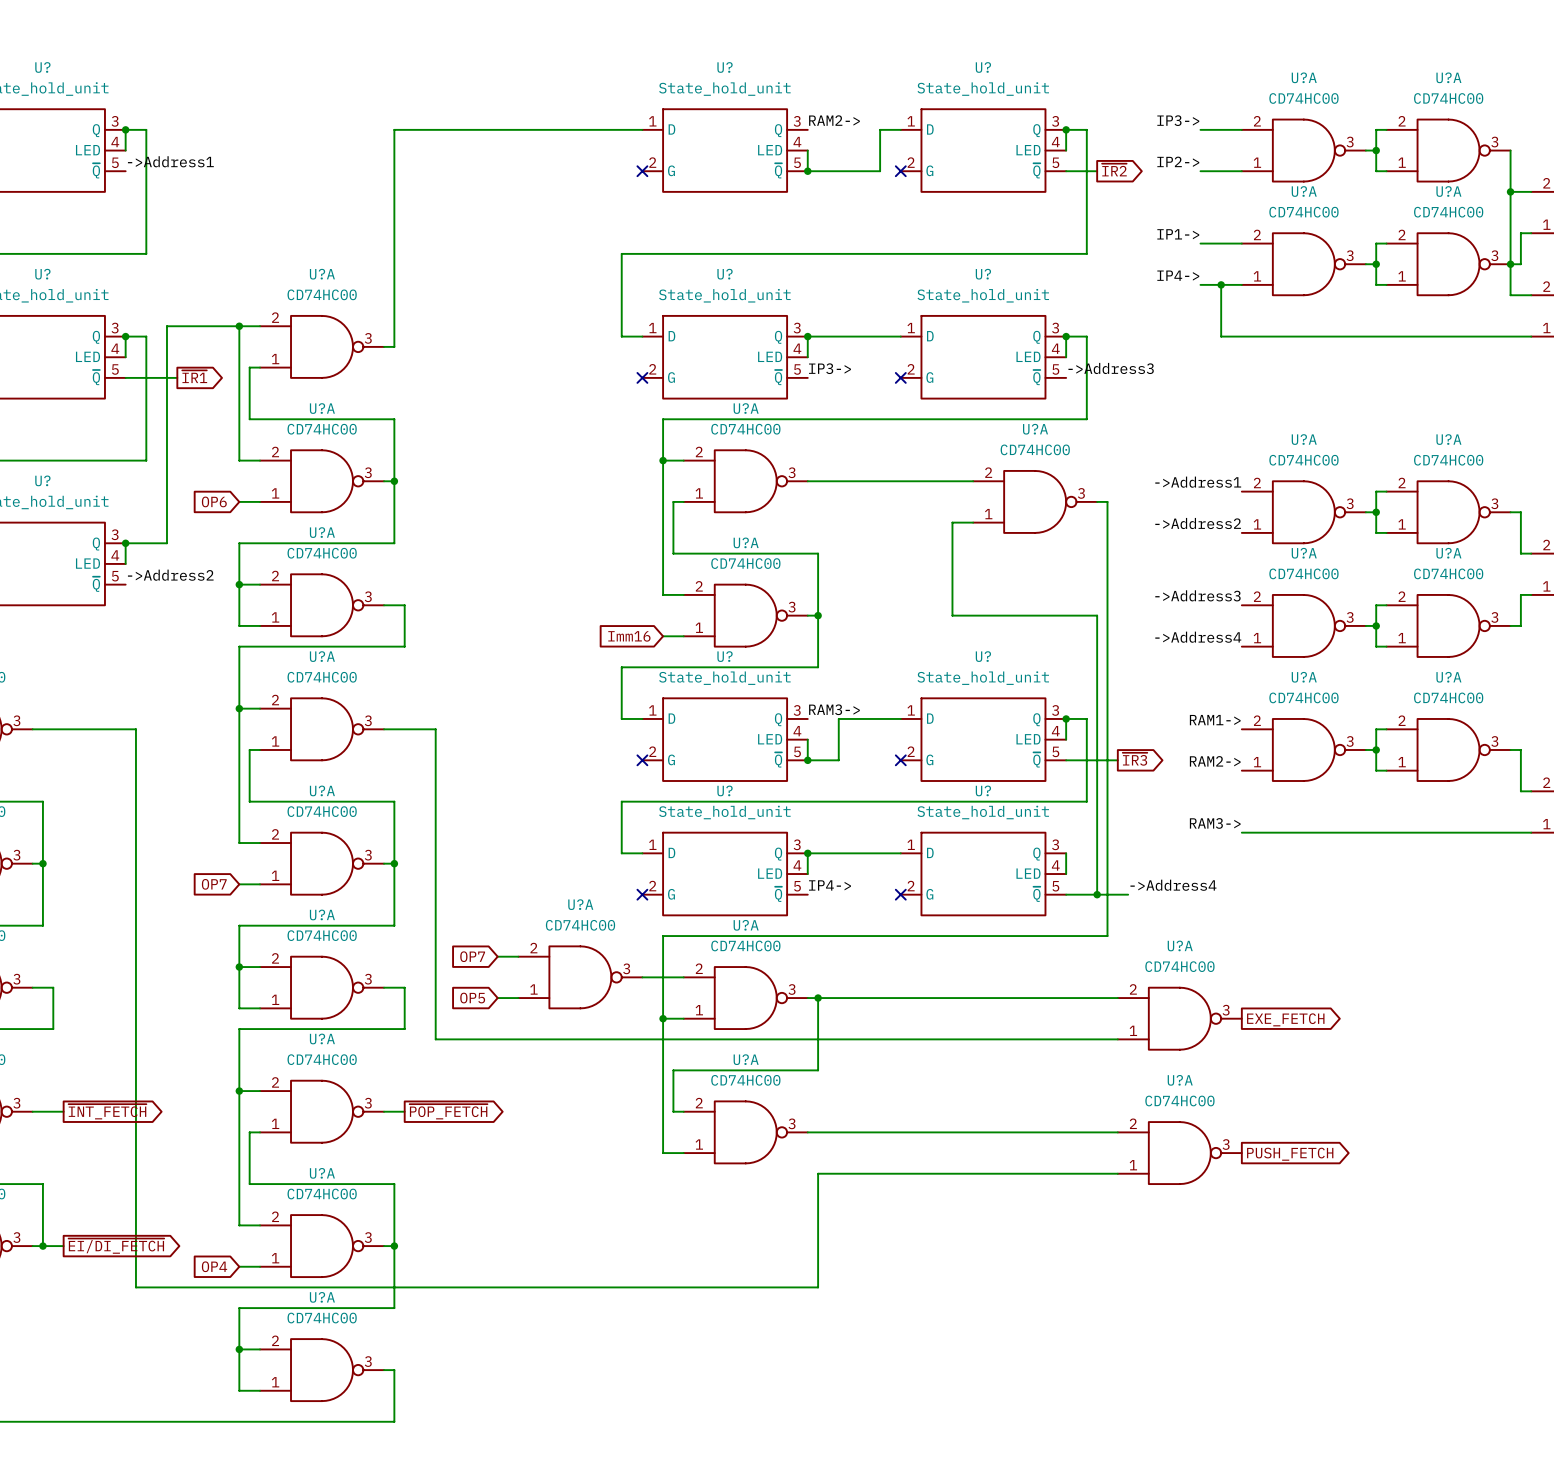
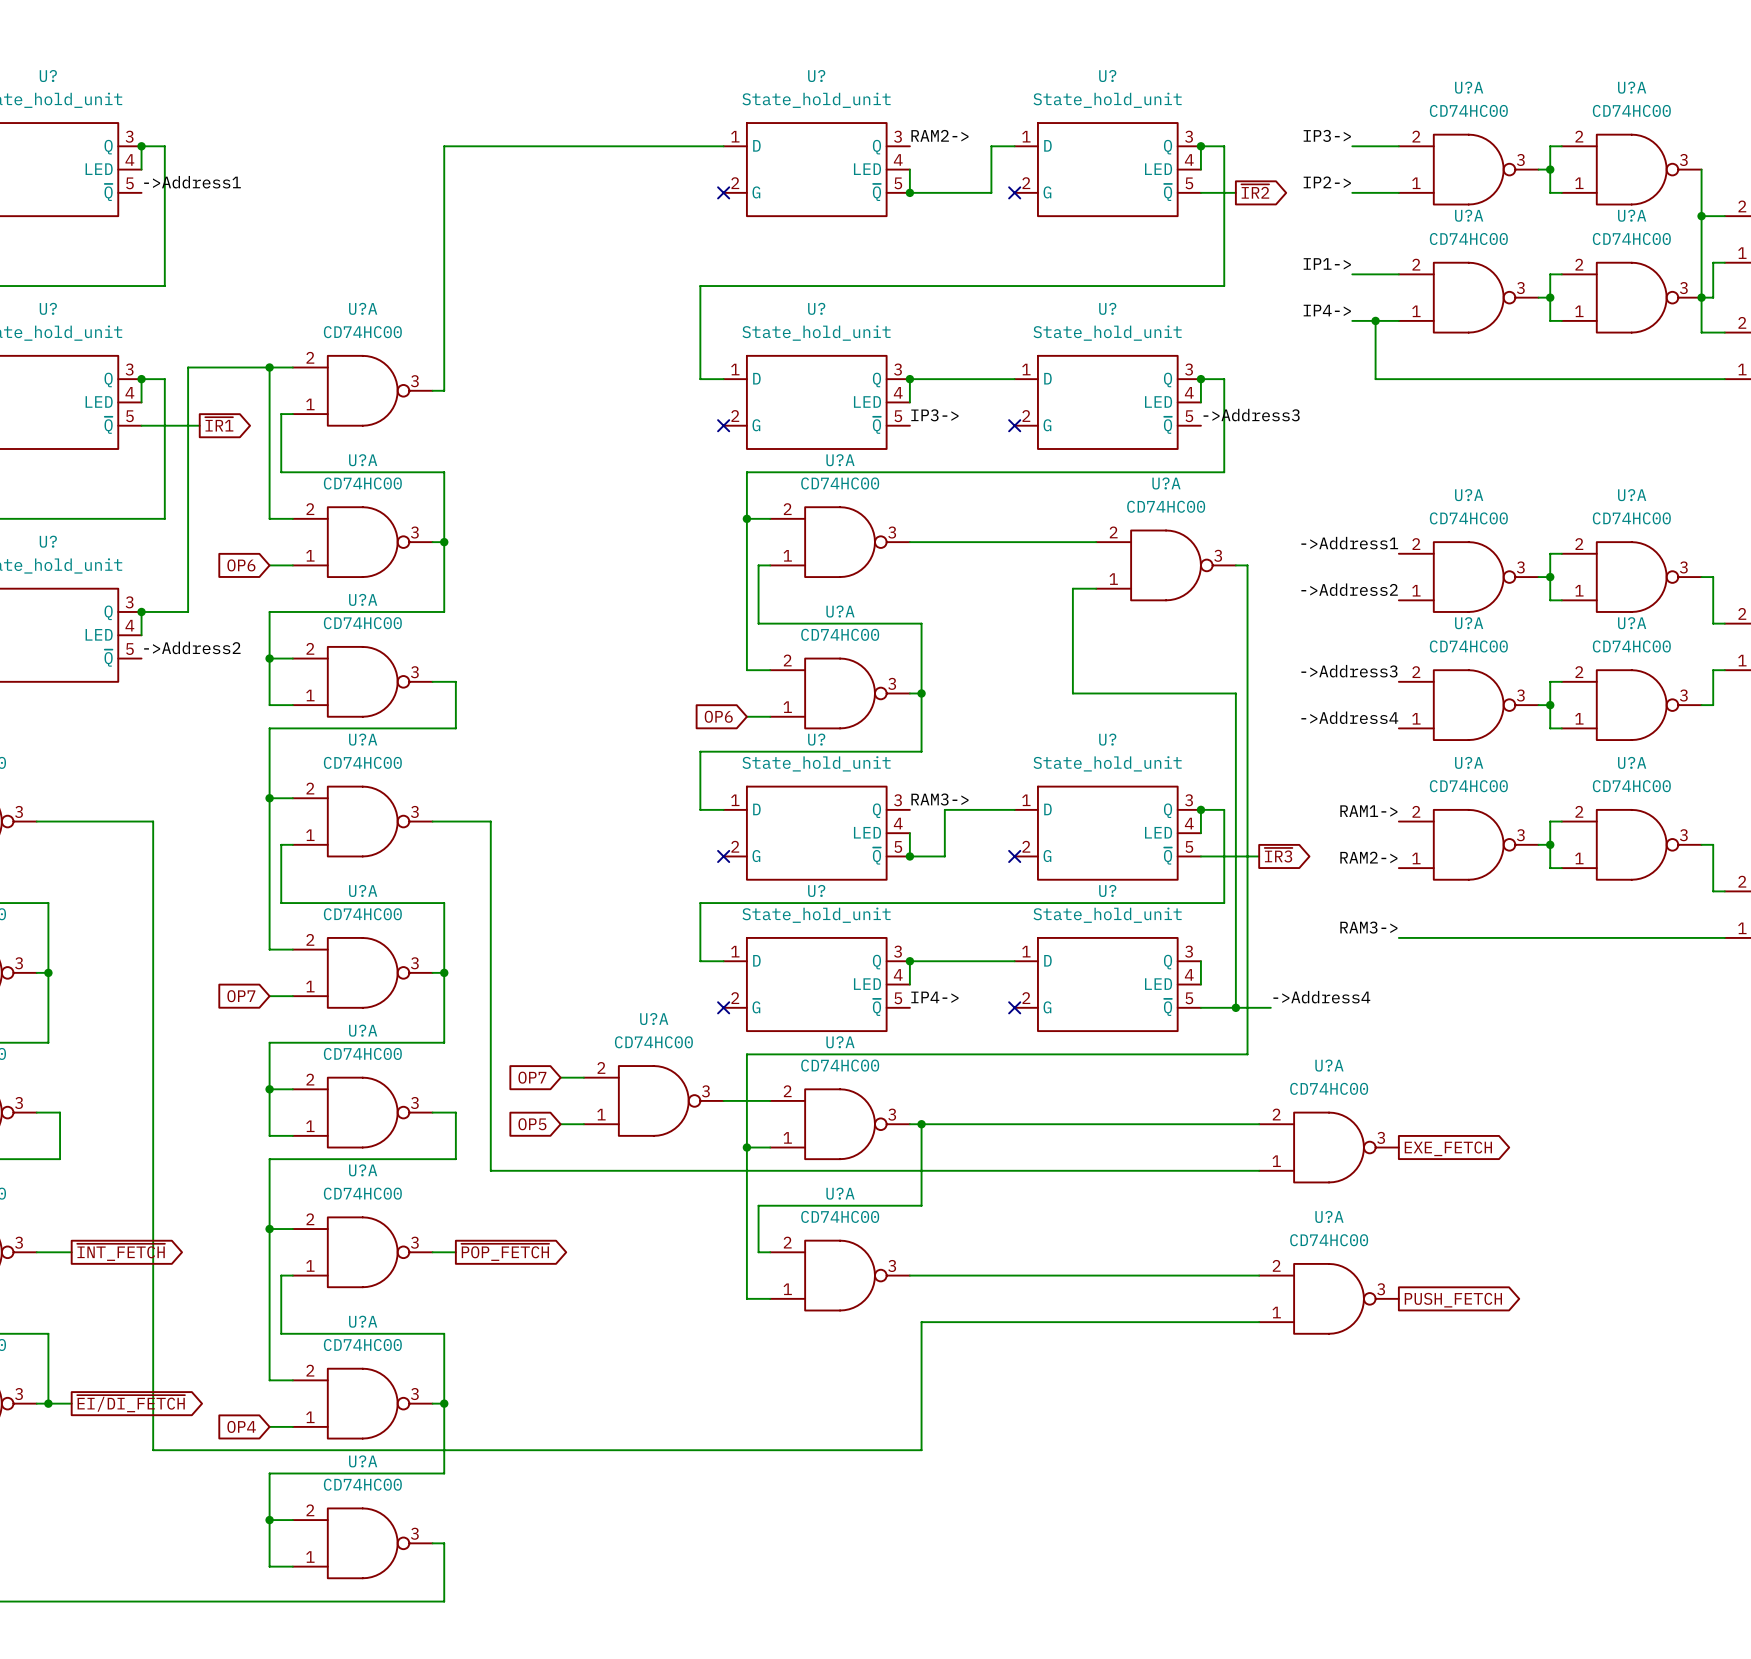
global label: Imm16 (629, 636) -> OP6 (718, 716)

